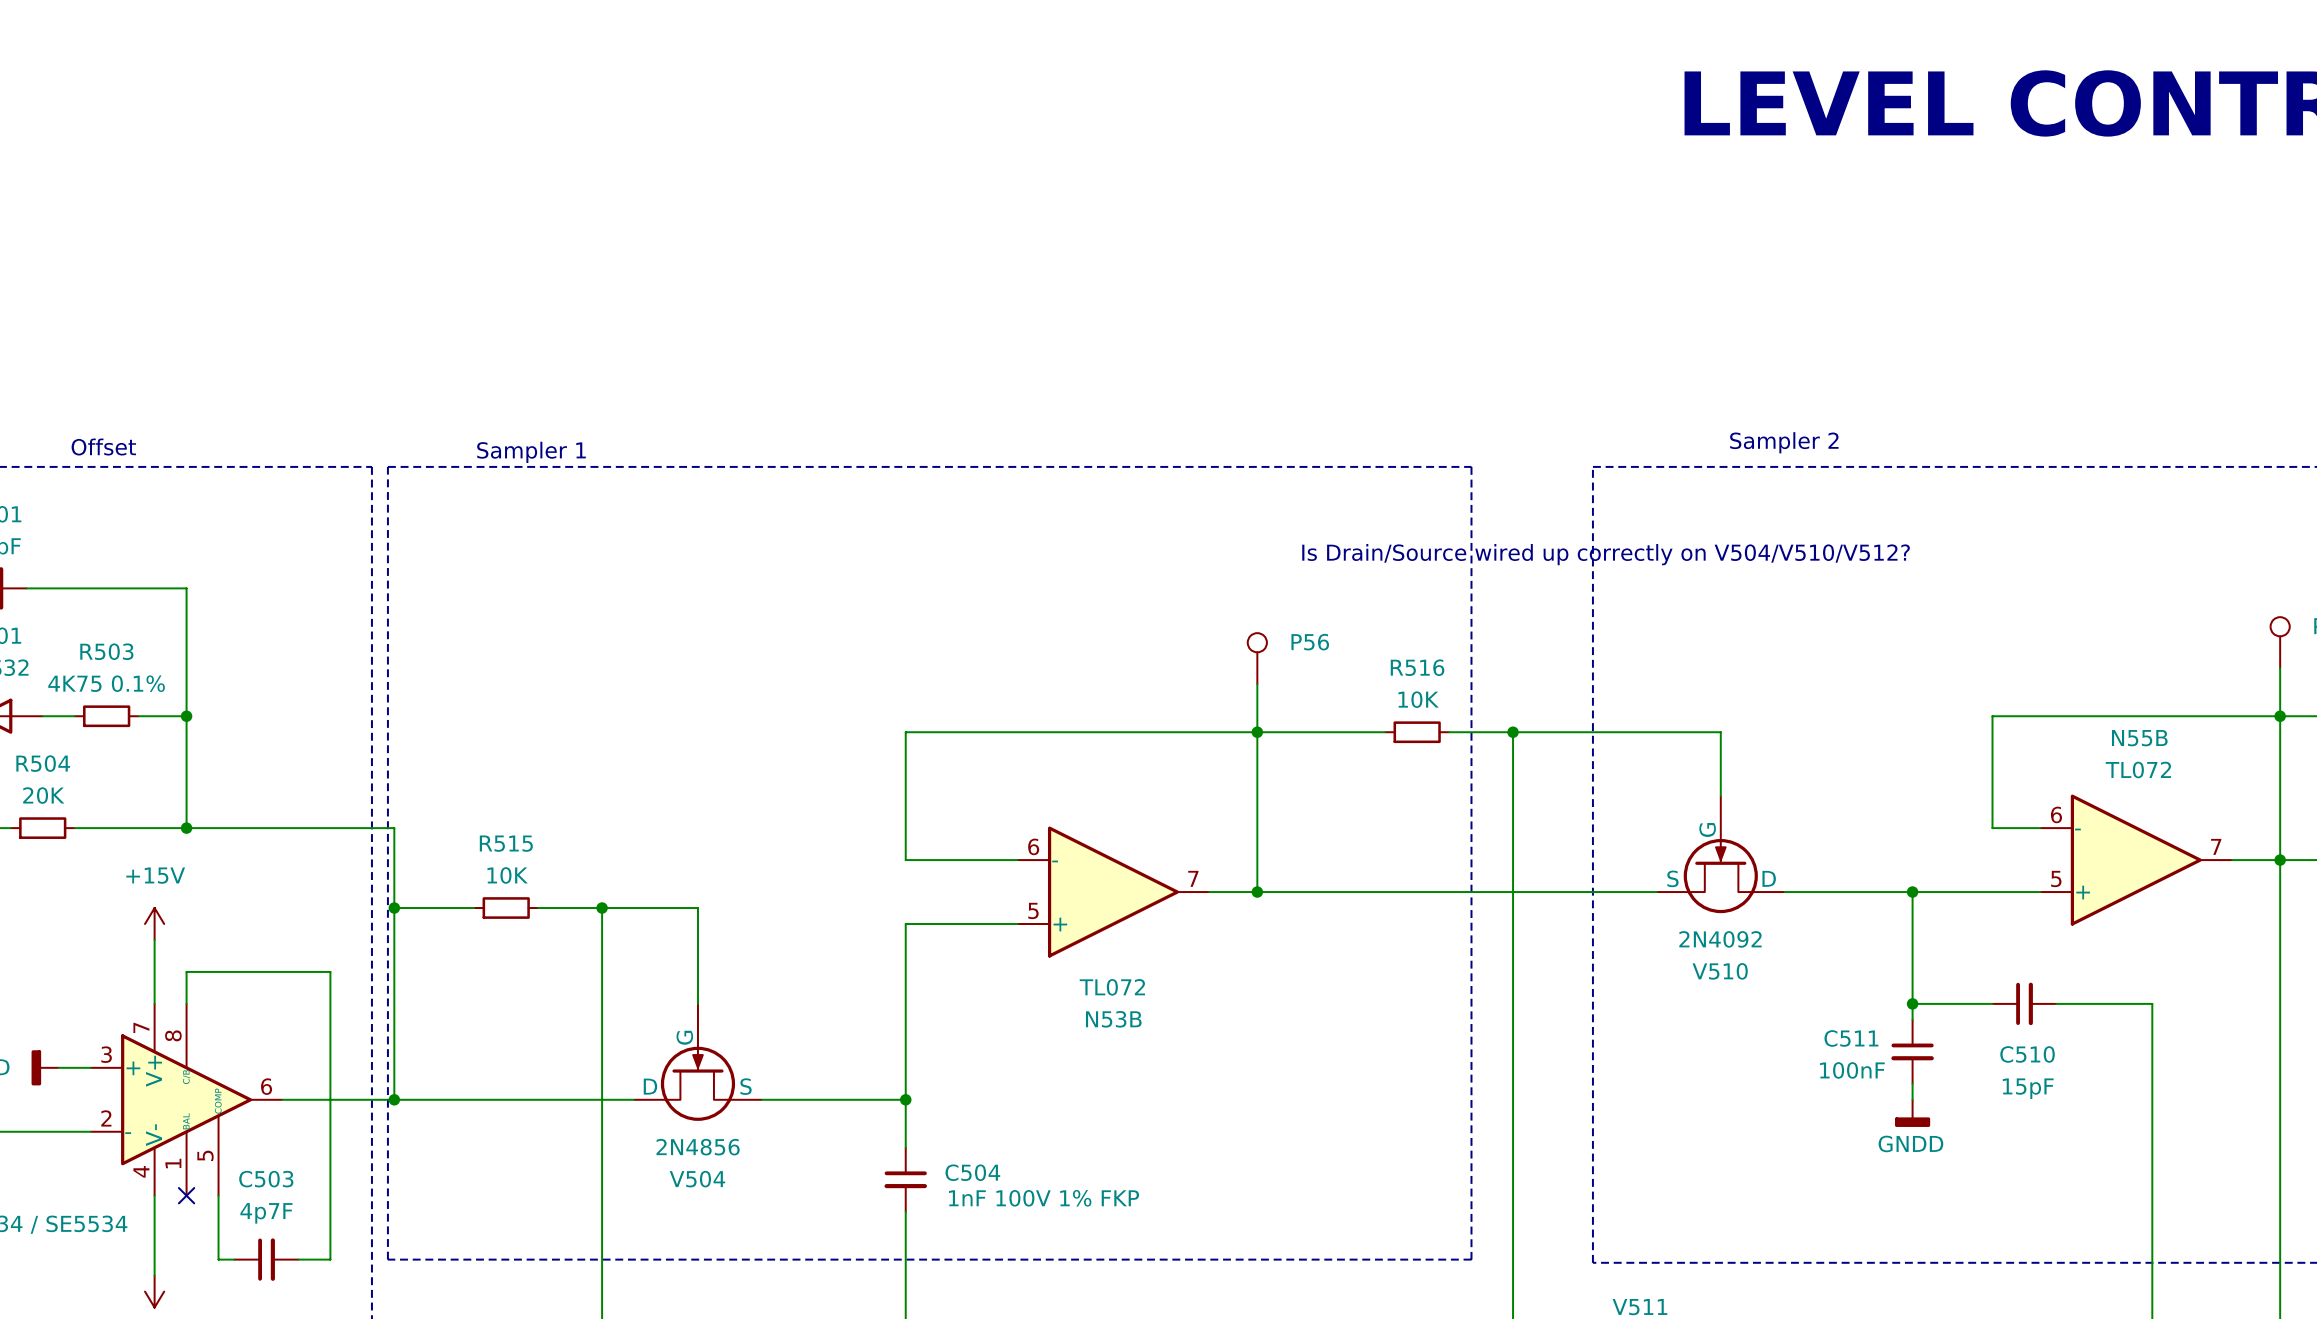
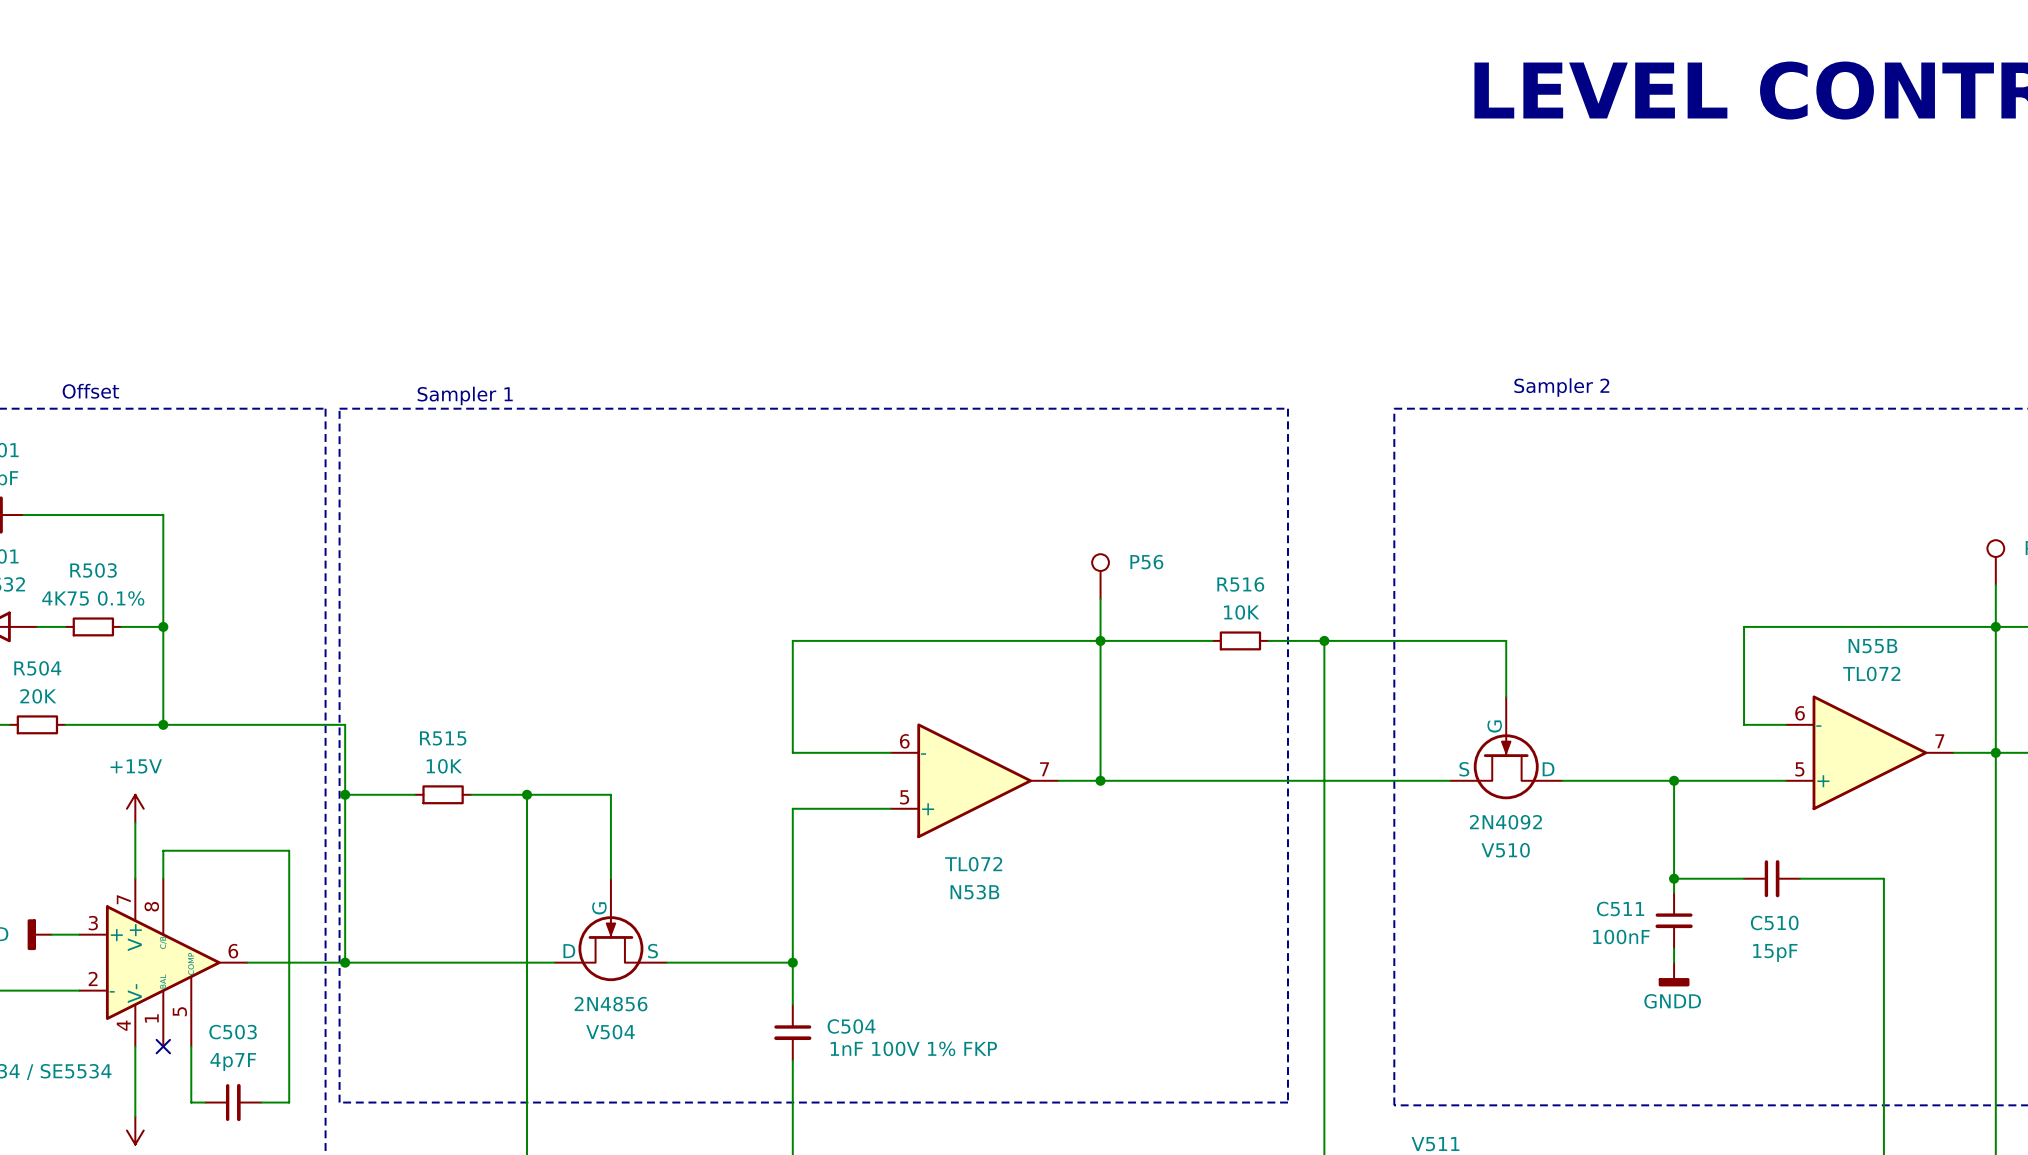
text: Is Drain/Source wired up correctly on V504/V510/V512? (1606, 554) -> none

